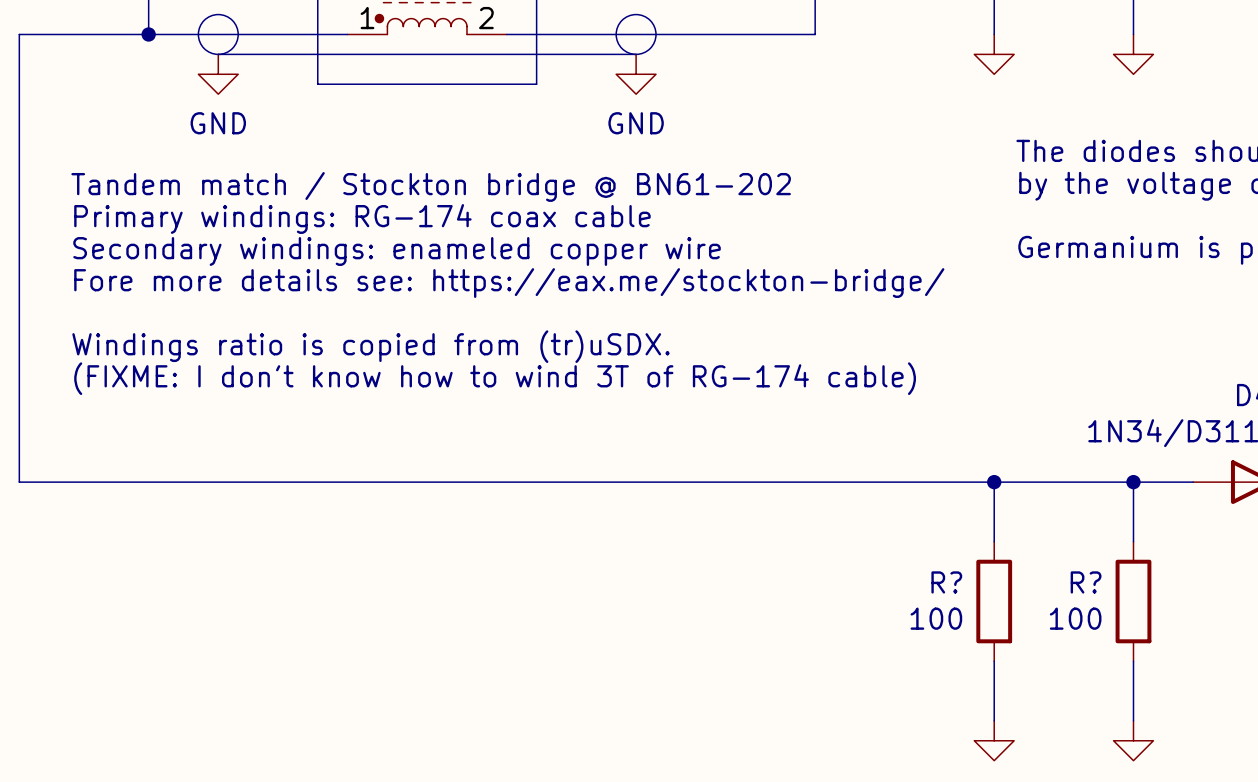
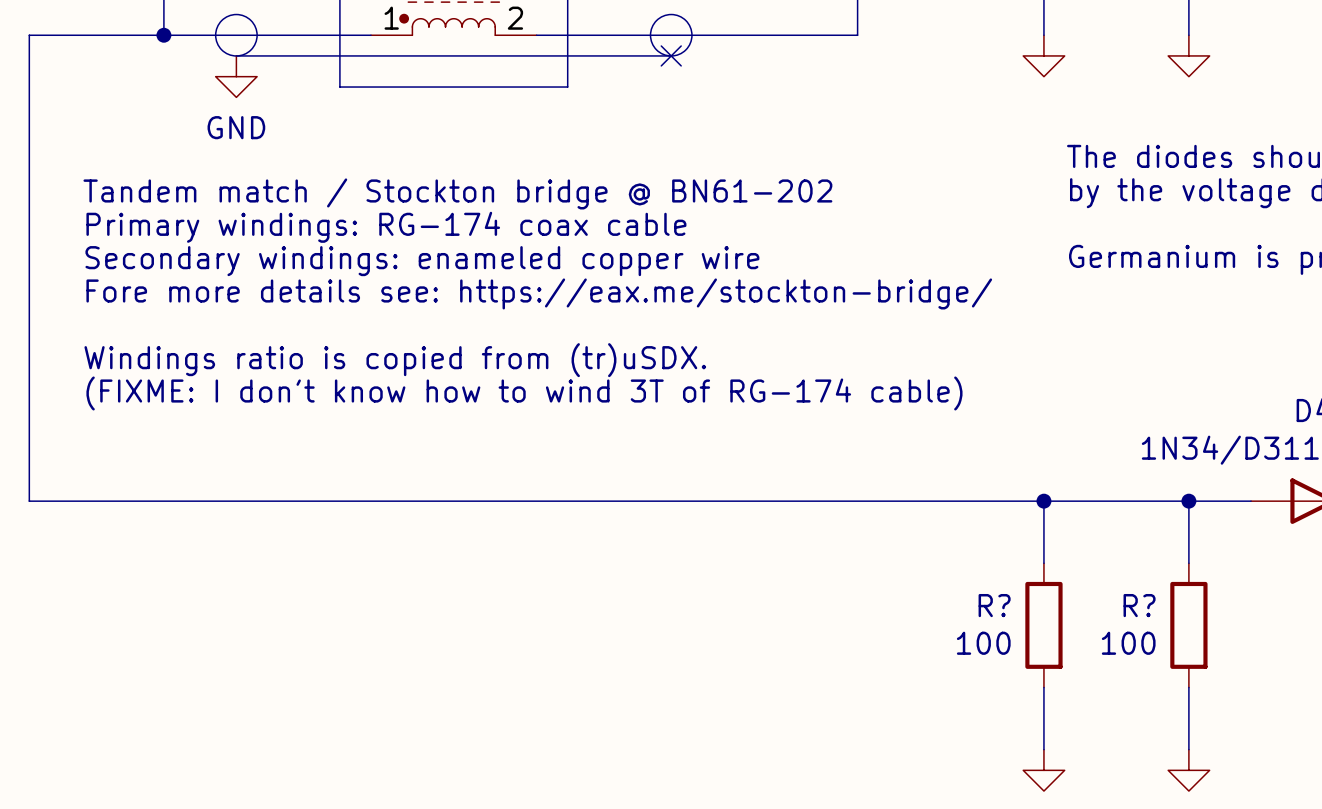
no-connect mark: none -> (671, 55)
power symbol: GND (636, 74) -> none

